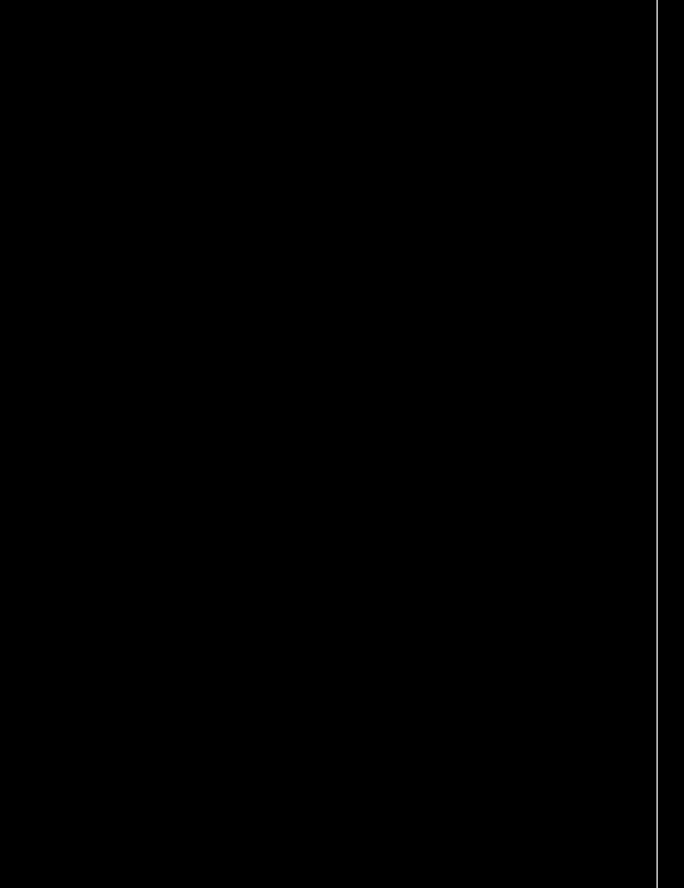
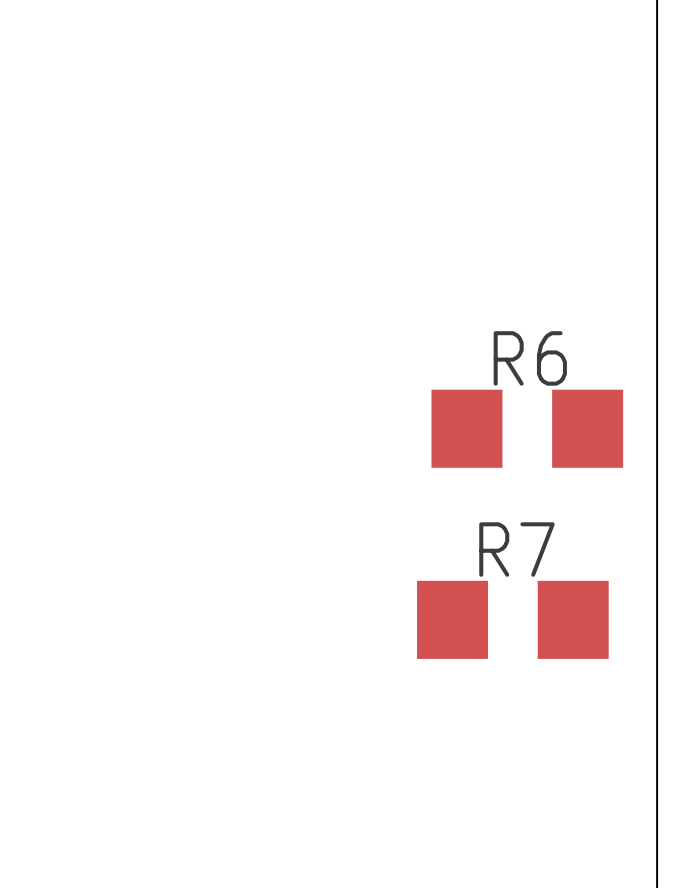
R6: none -> (527, 428)
R7: none -> (512, 619)

